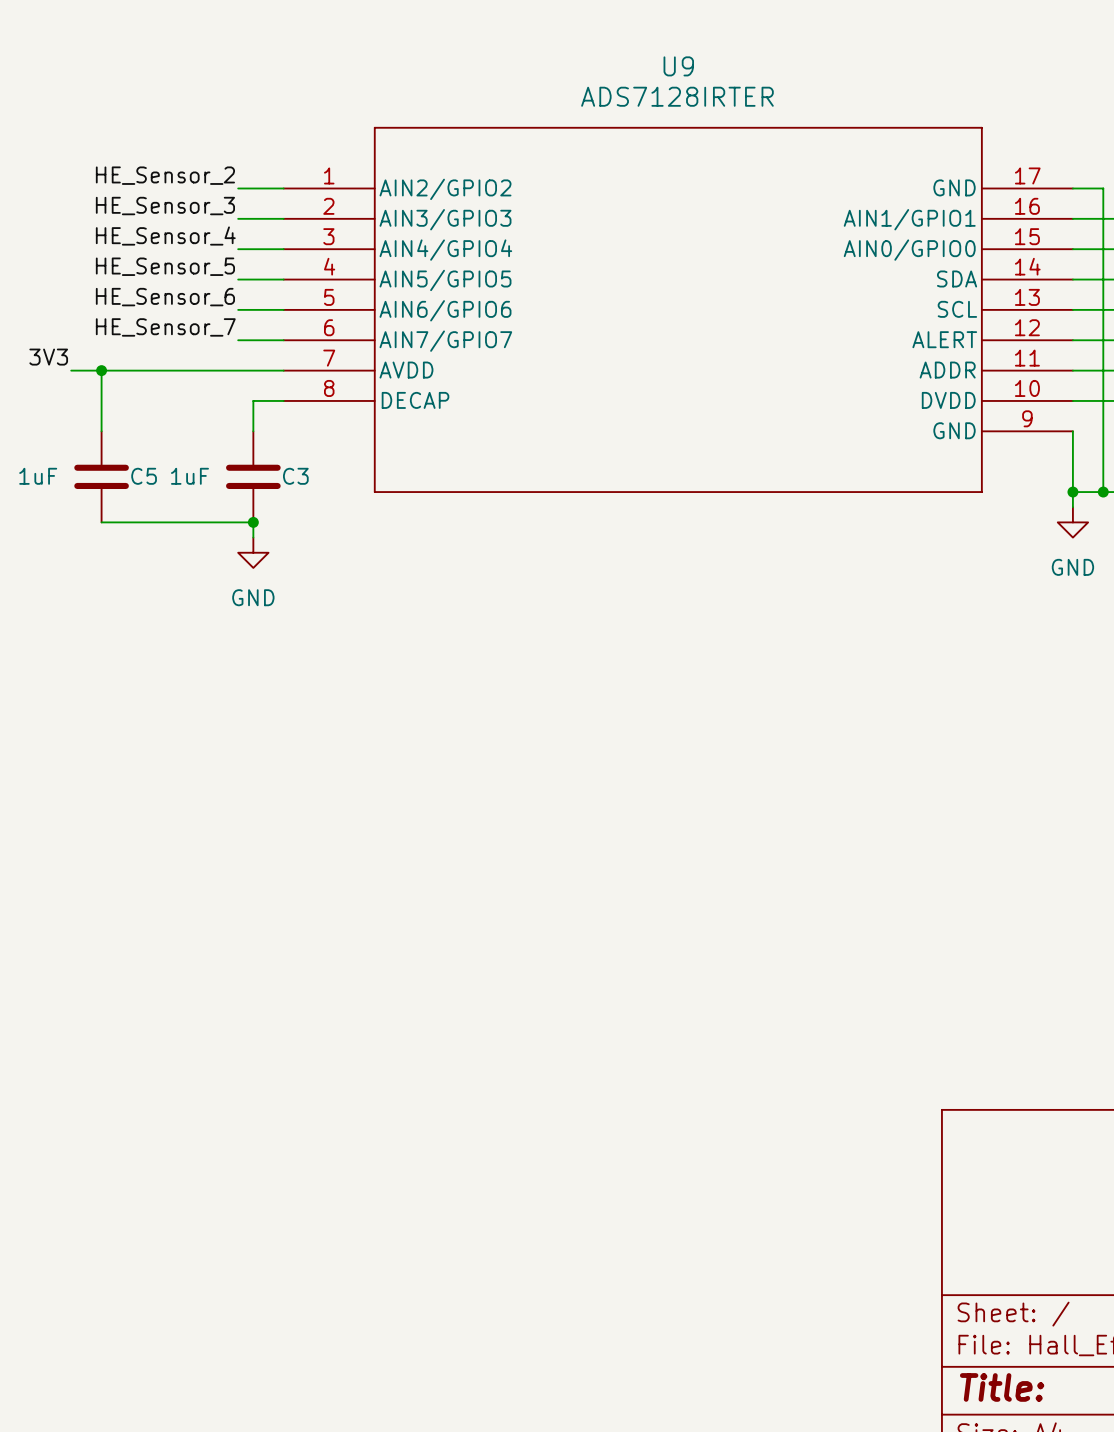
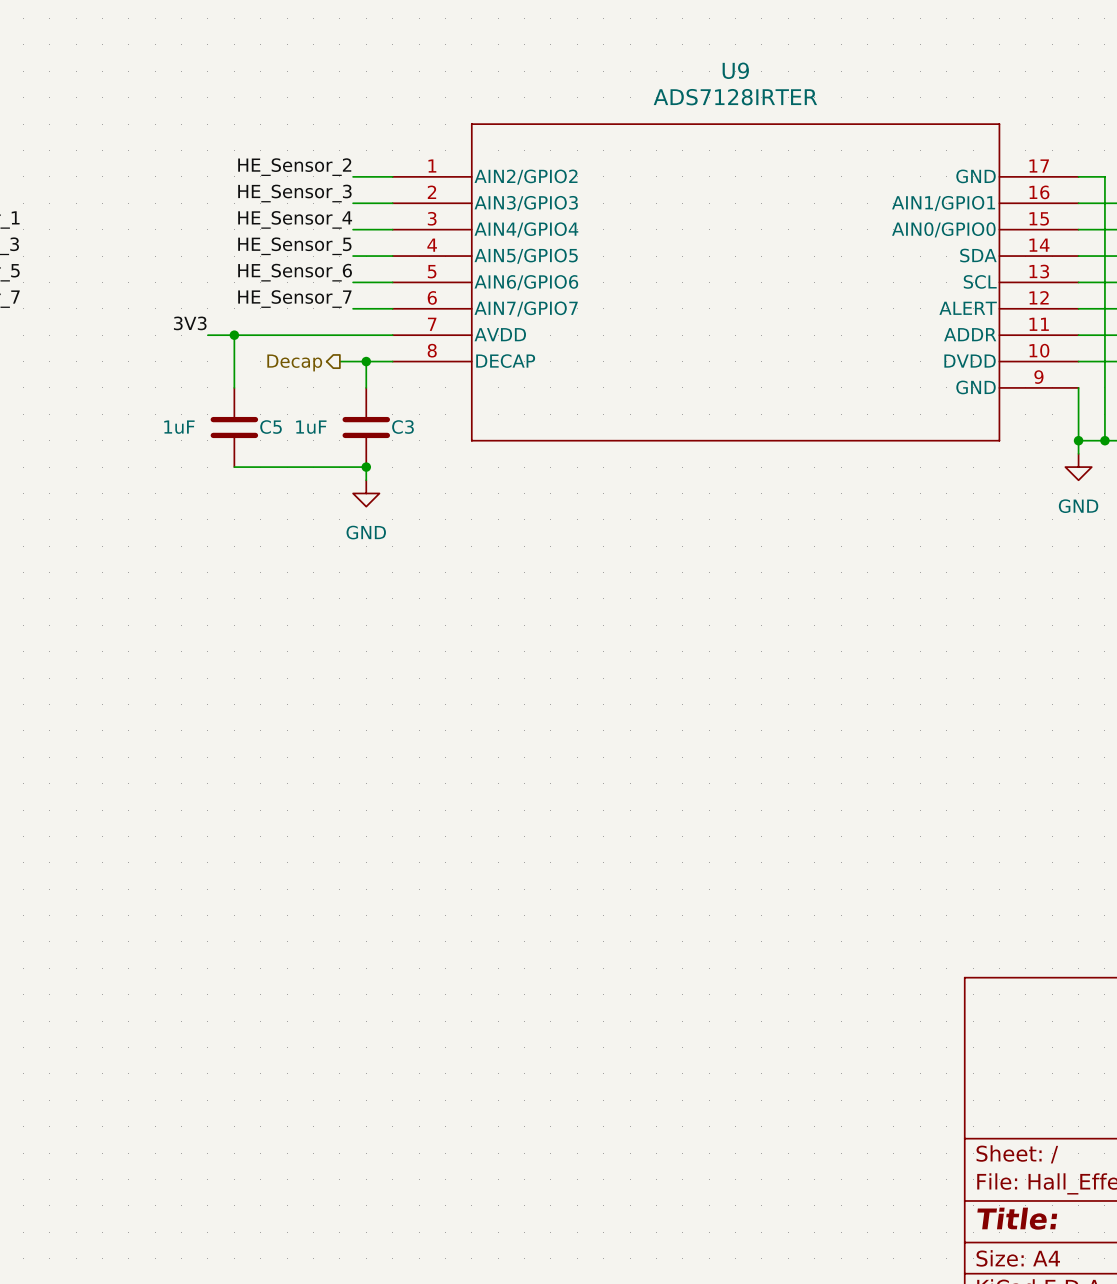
wire: none -> (339, 361) (366, 361)
junction: none -> (366, 361)
hierarchical label: none -> Decap (294, 362)

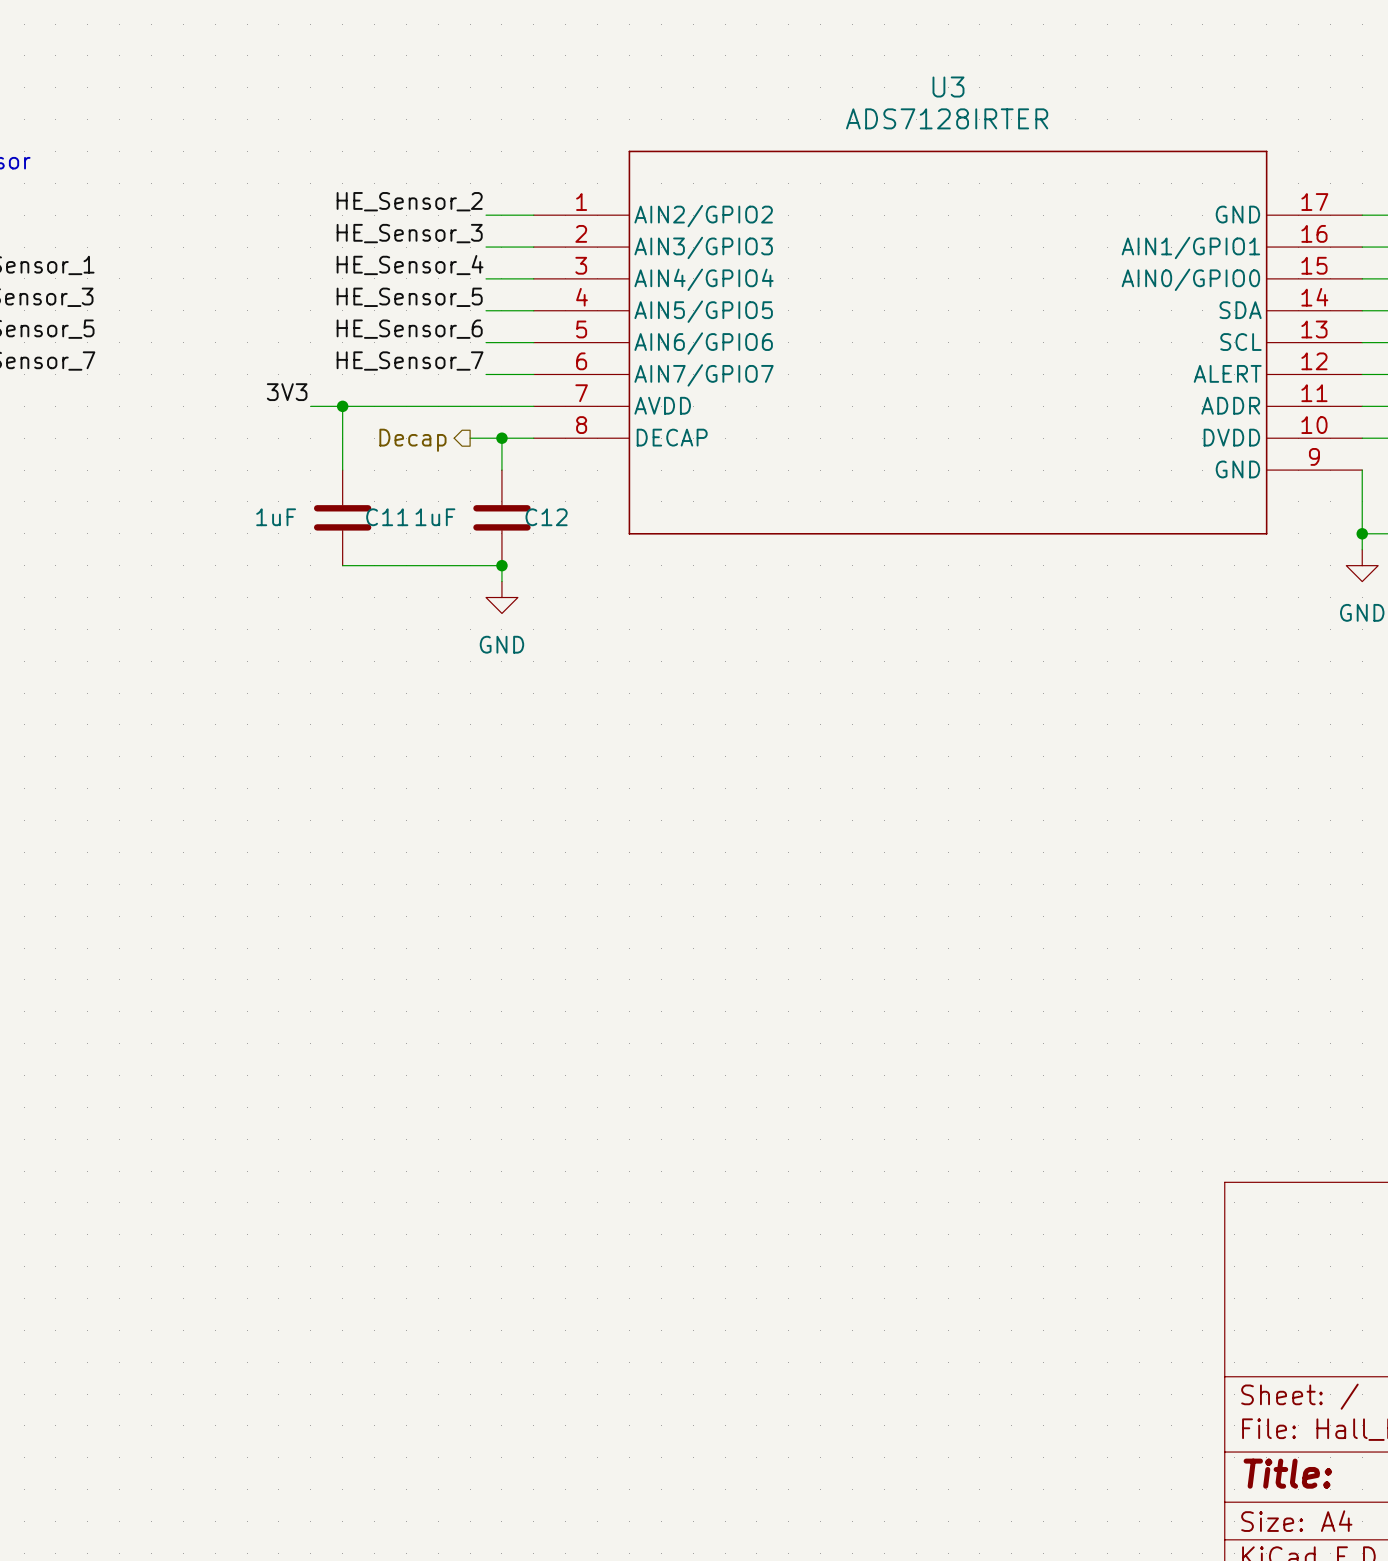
U9 name: U9 (735, 70) -> U3 (948, 87)
C5 name: C5 (271, 427) -> C11 (387, 517)
C3 name: C3 (402, 427) -> C12 (546, 517)

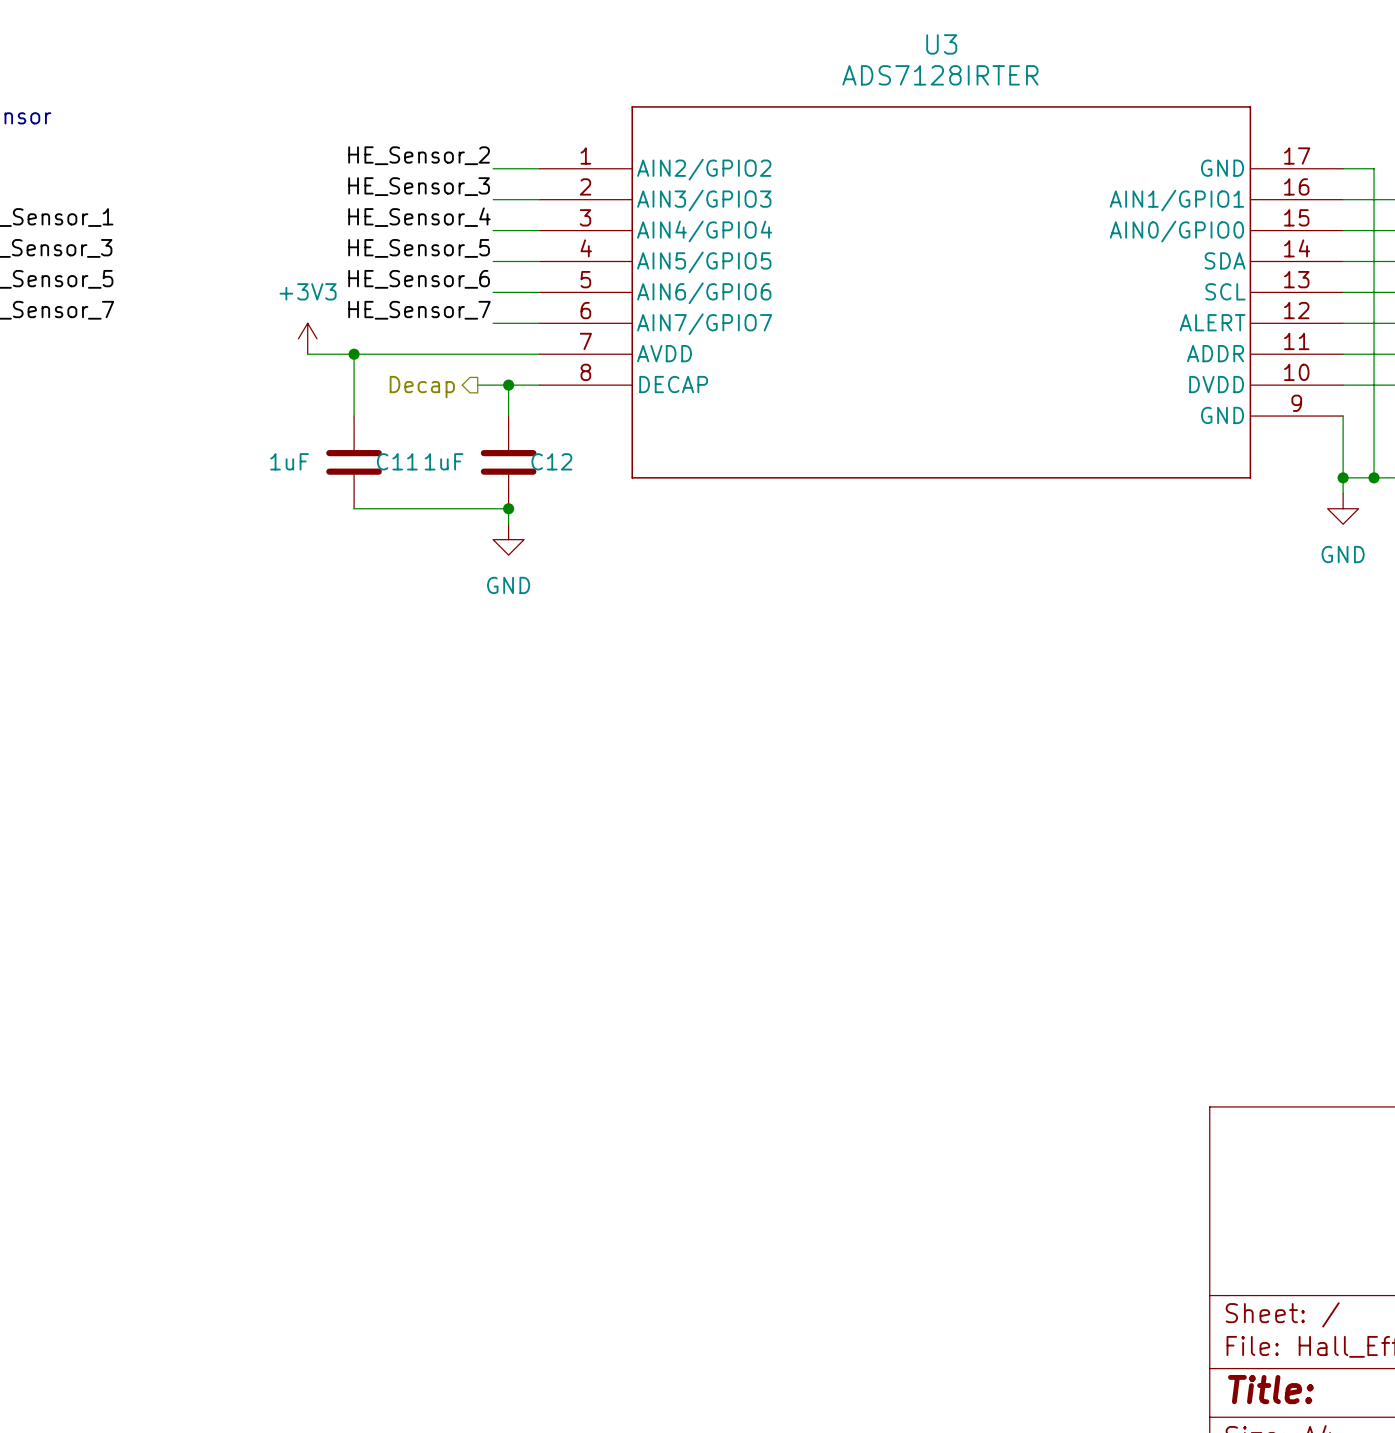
power symbol: none -> +3V3 (307, 338)
label: 3V3 (287, 392) -> none
wire: none -> (307, 354) (323, 354)

